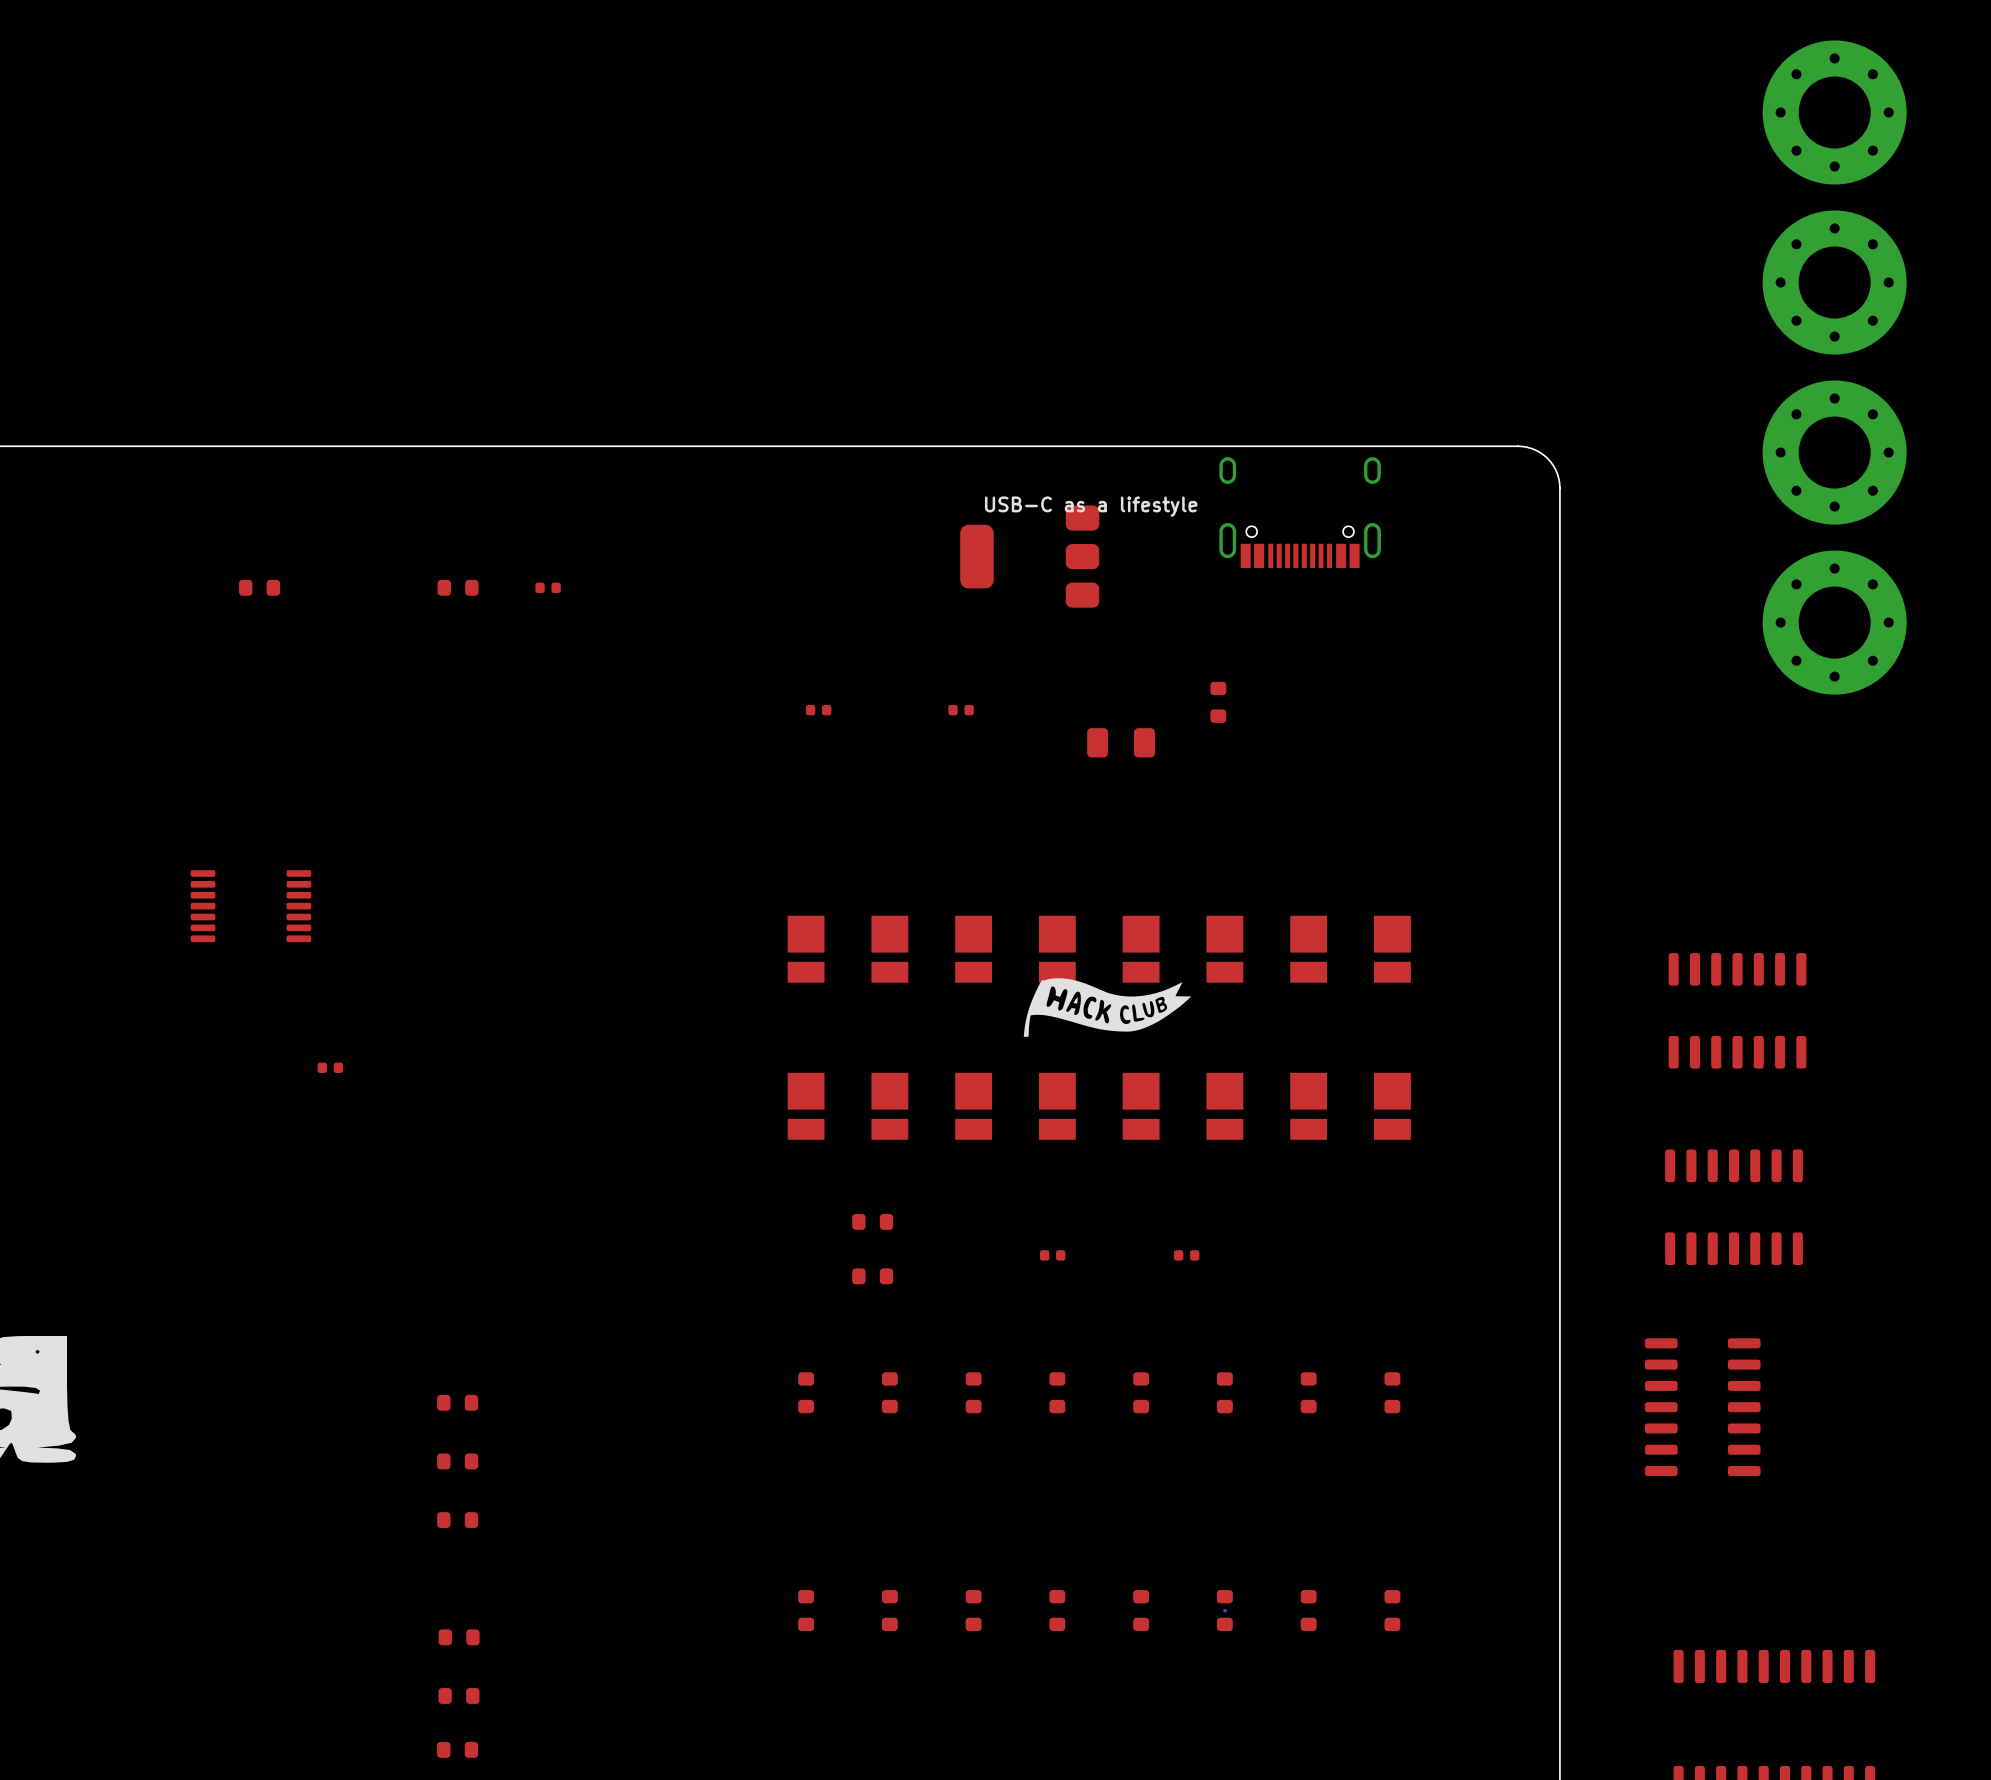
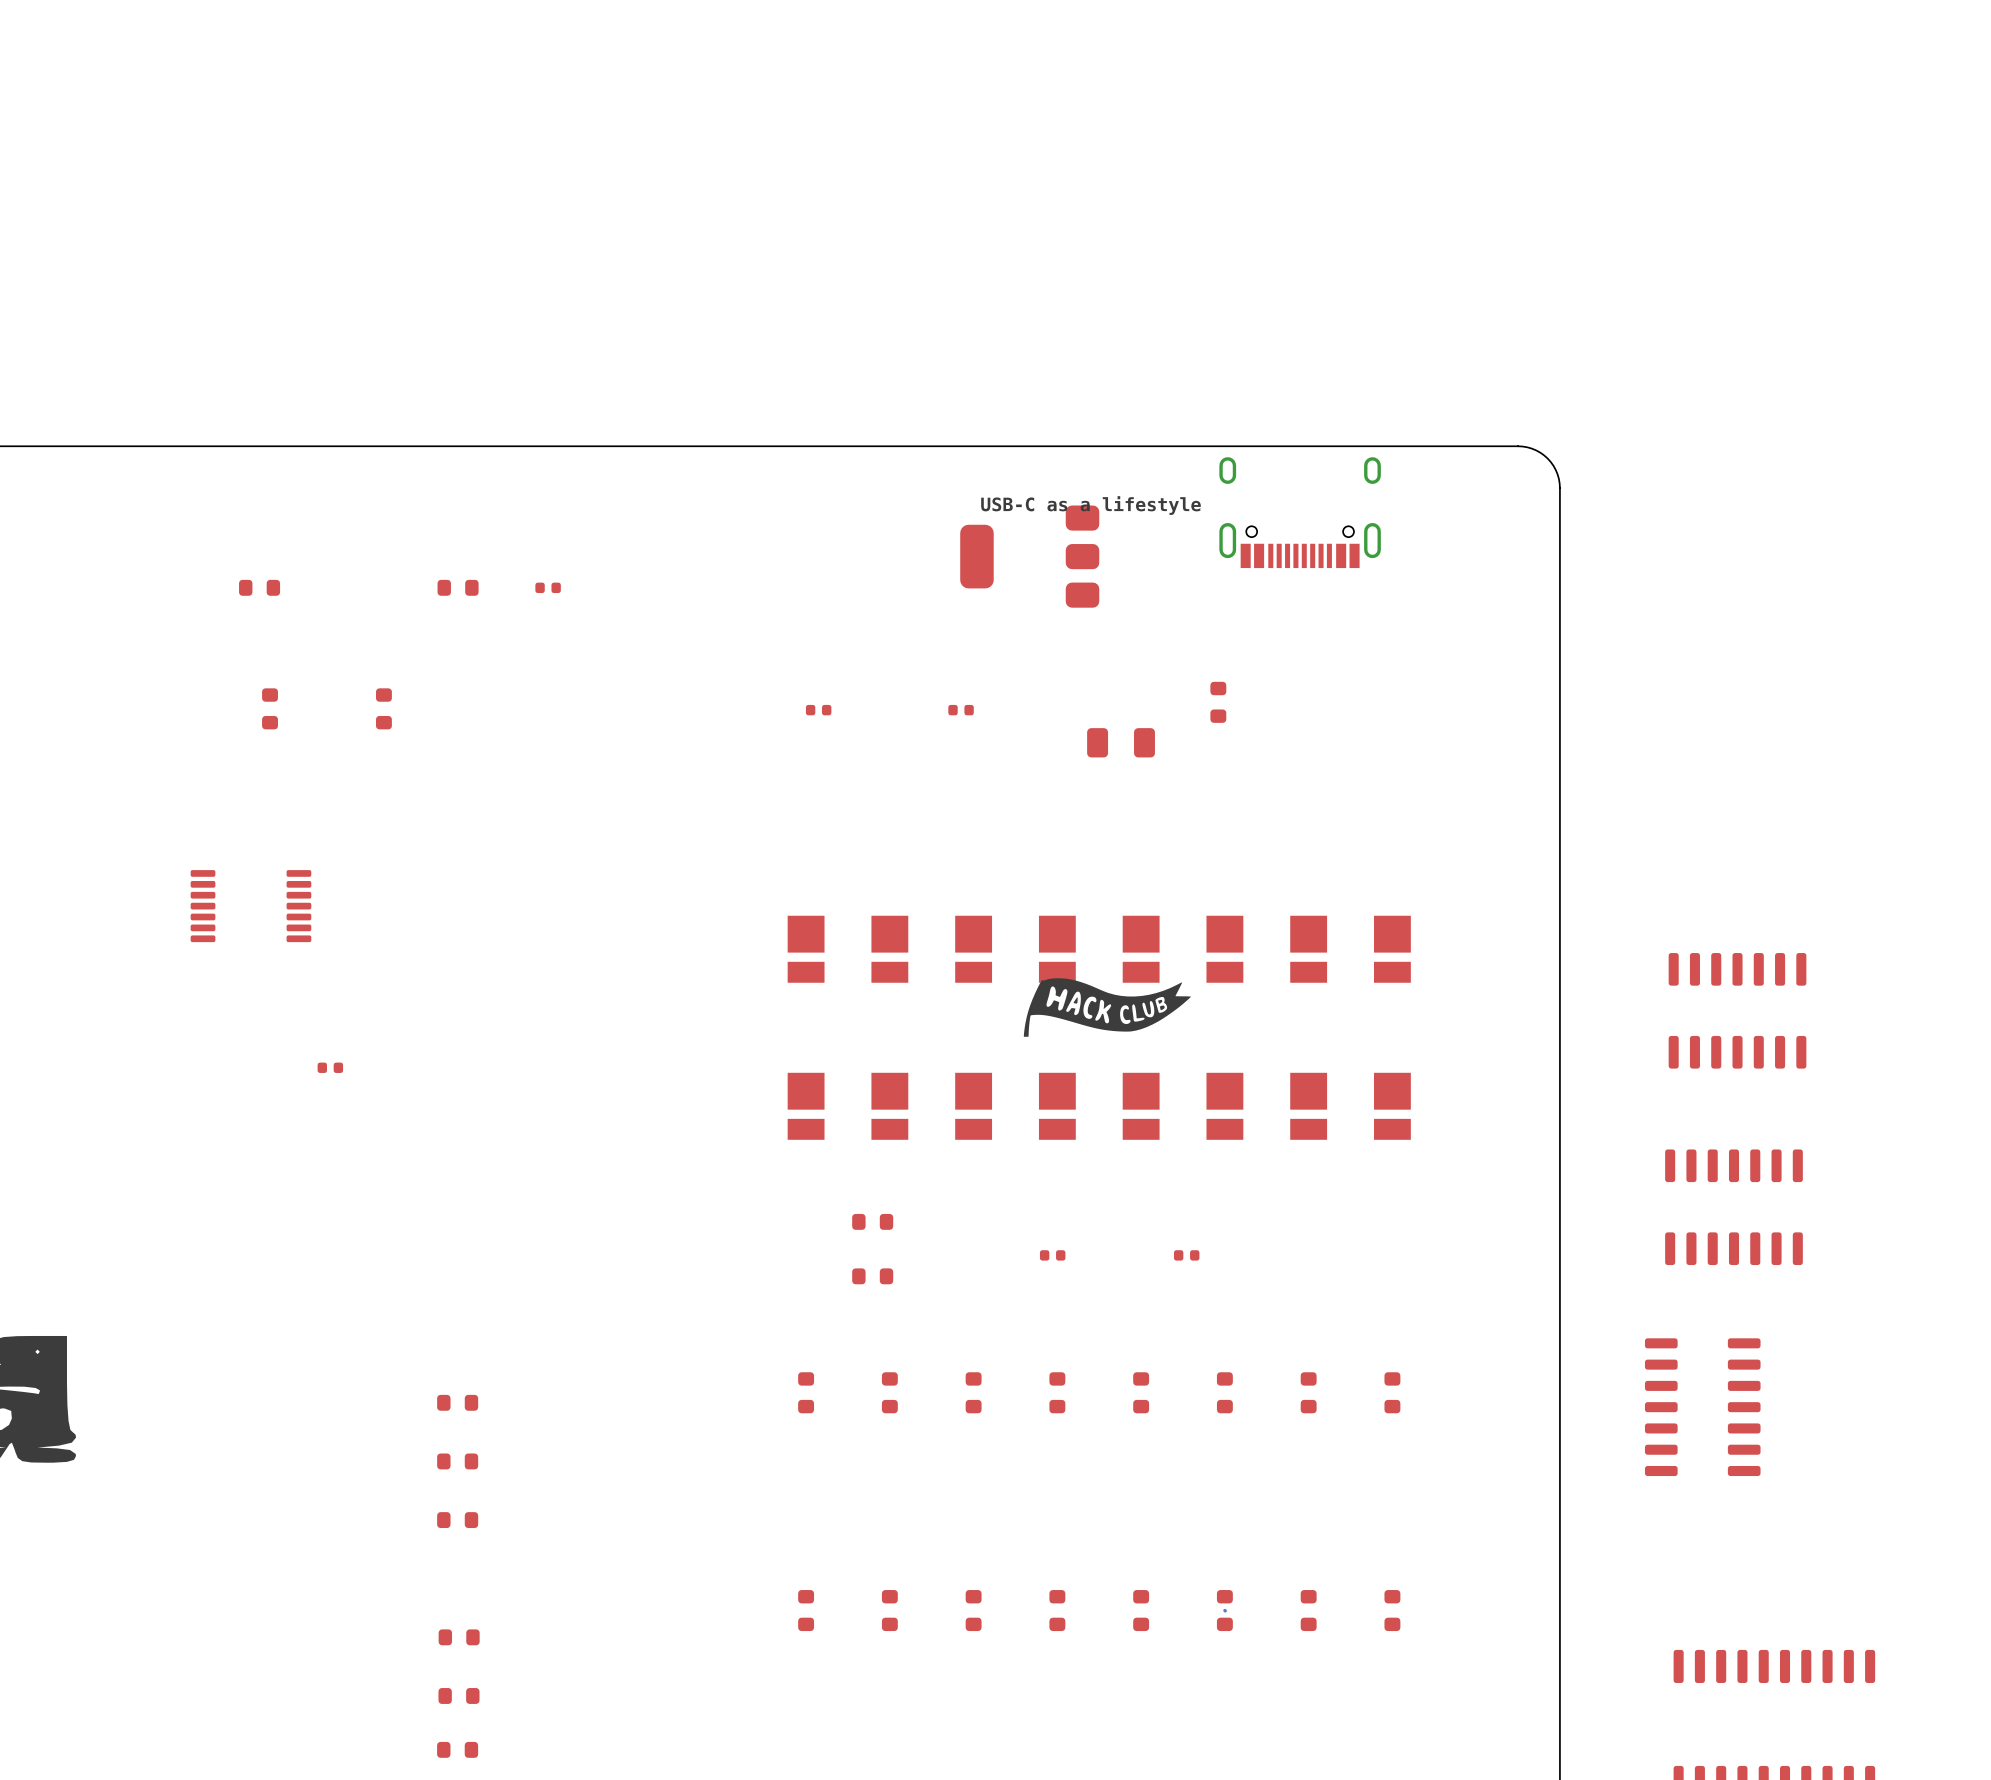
part: (1834, 112) -> none
part: (1834, 282) -> none
part: (1834, 452) -> none
part: (1834, 622) -> none
part: none -> (270, 708)
part: none -> (383, 708)

